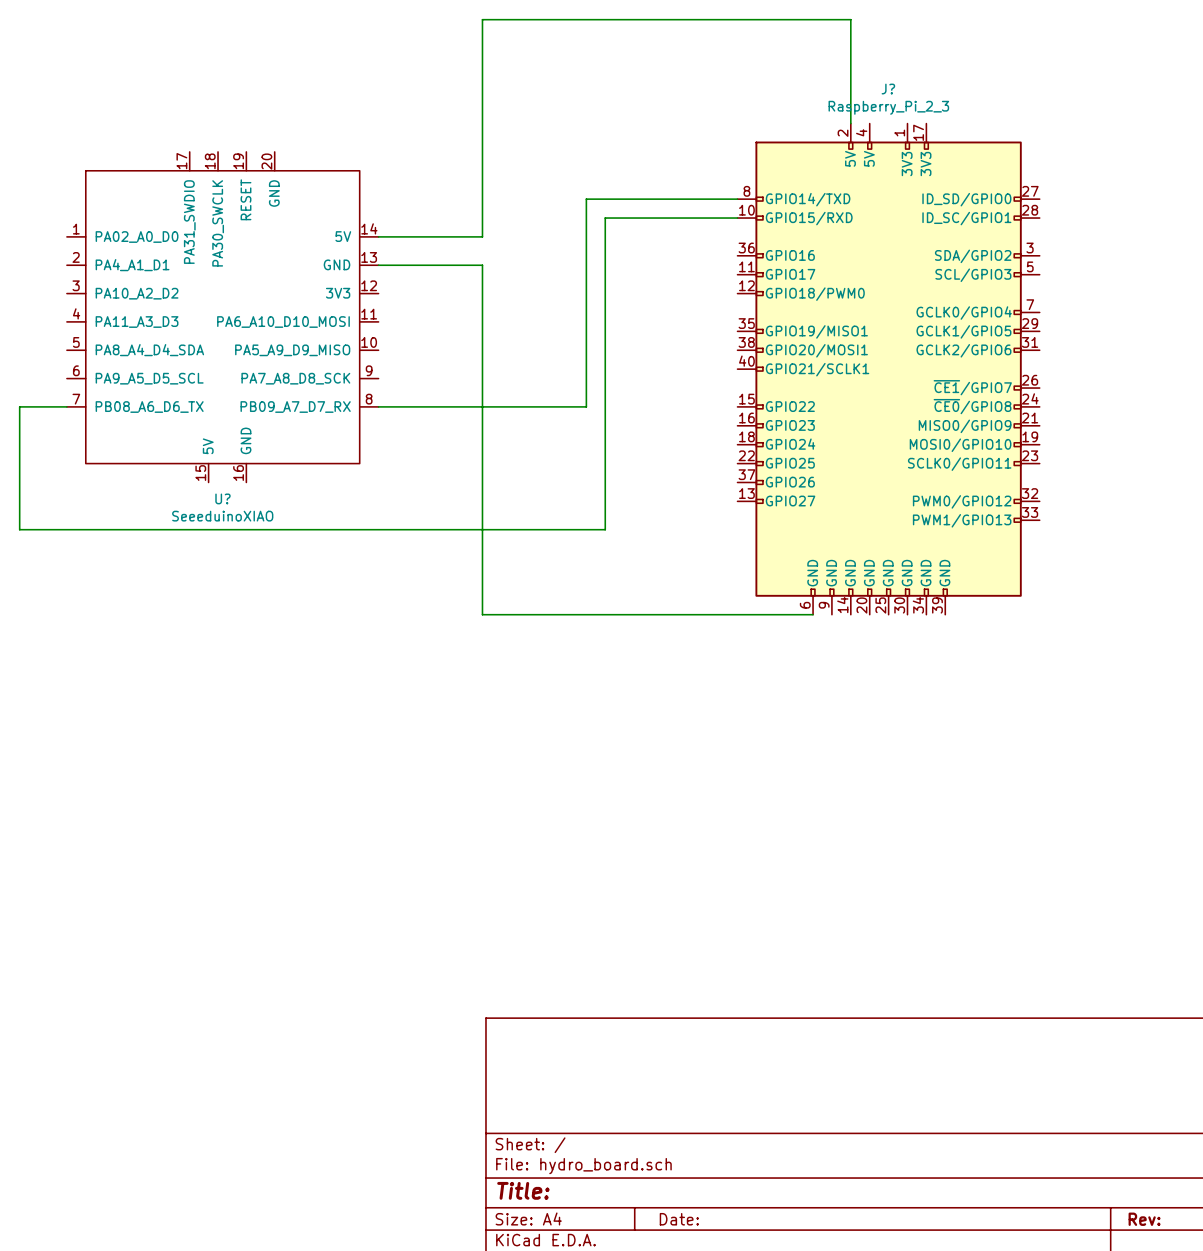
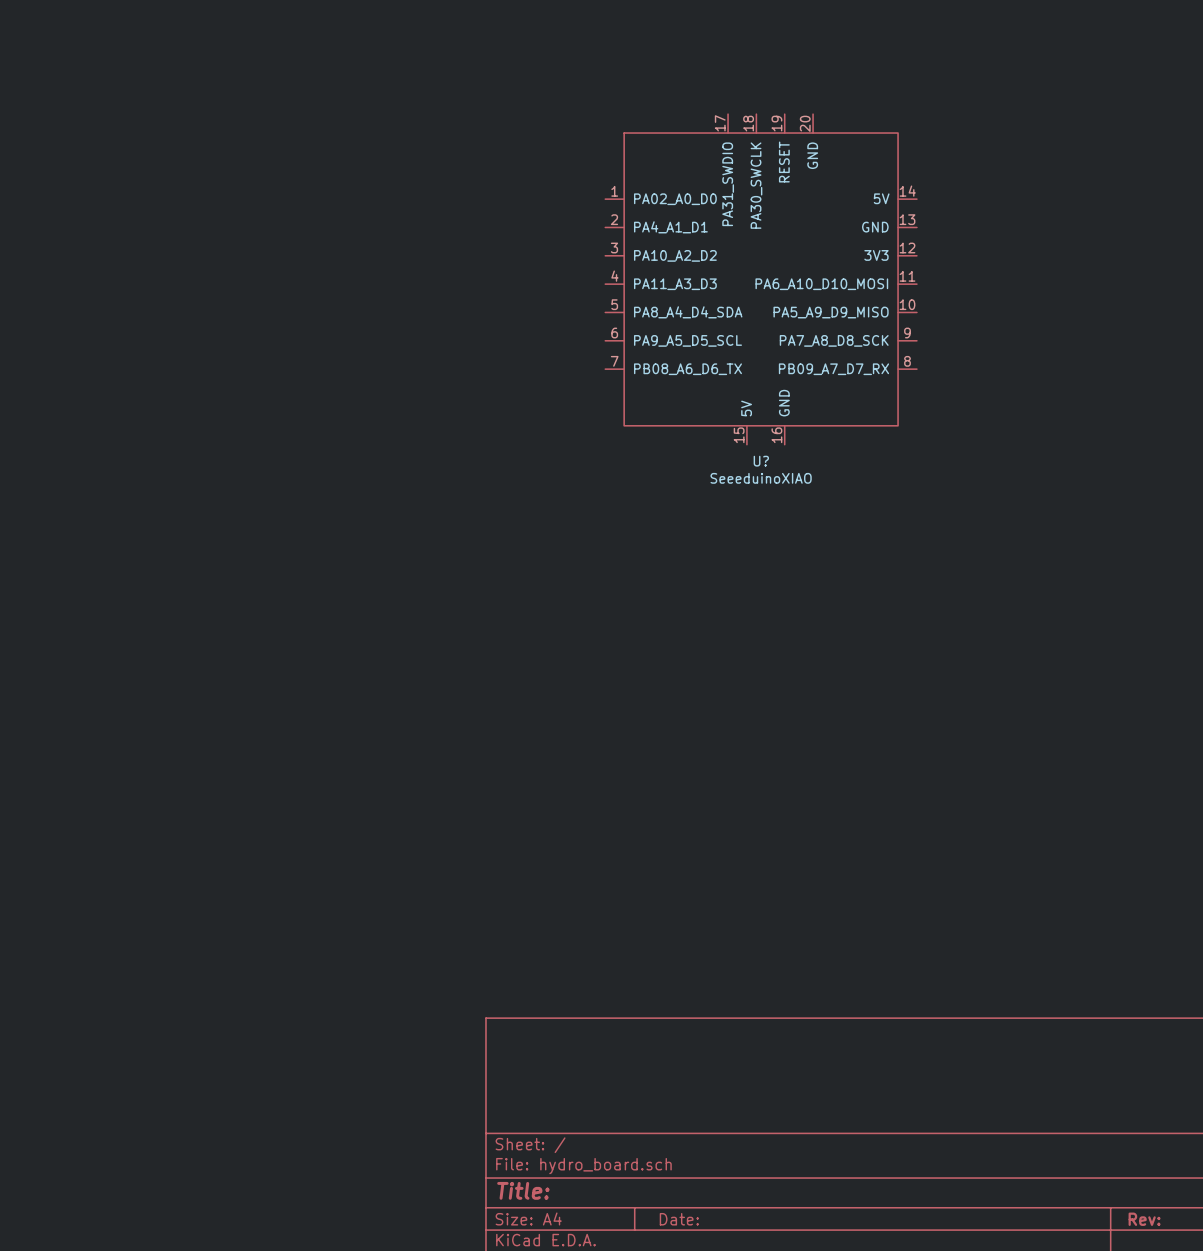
wire: (850, 123) (850, 19) (482, 19) (482, 236) (378, 236) -> none
wire: (737, 199) (586, 199) (586, 406) (378, 406) -> none
wire: (737, 218) (605, 218) (605, 529) (19, 529) (19, 406) (66, 406) -> none
wire: (378, 265) (482, 265) (482, 614) (813, 614) -> none
U?: none -> SeeeduinoXIAO (761, 279)
U?: SeeeduinoXIAO (222, 317) -> none
J?: Raspberry_Pi_2_3 (888, 369) -> none

